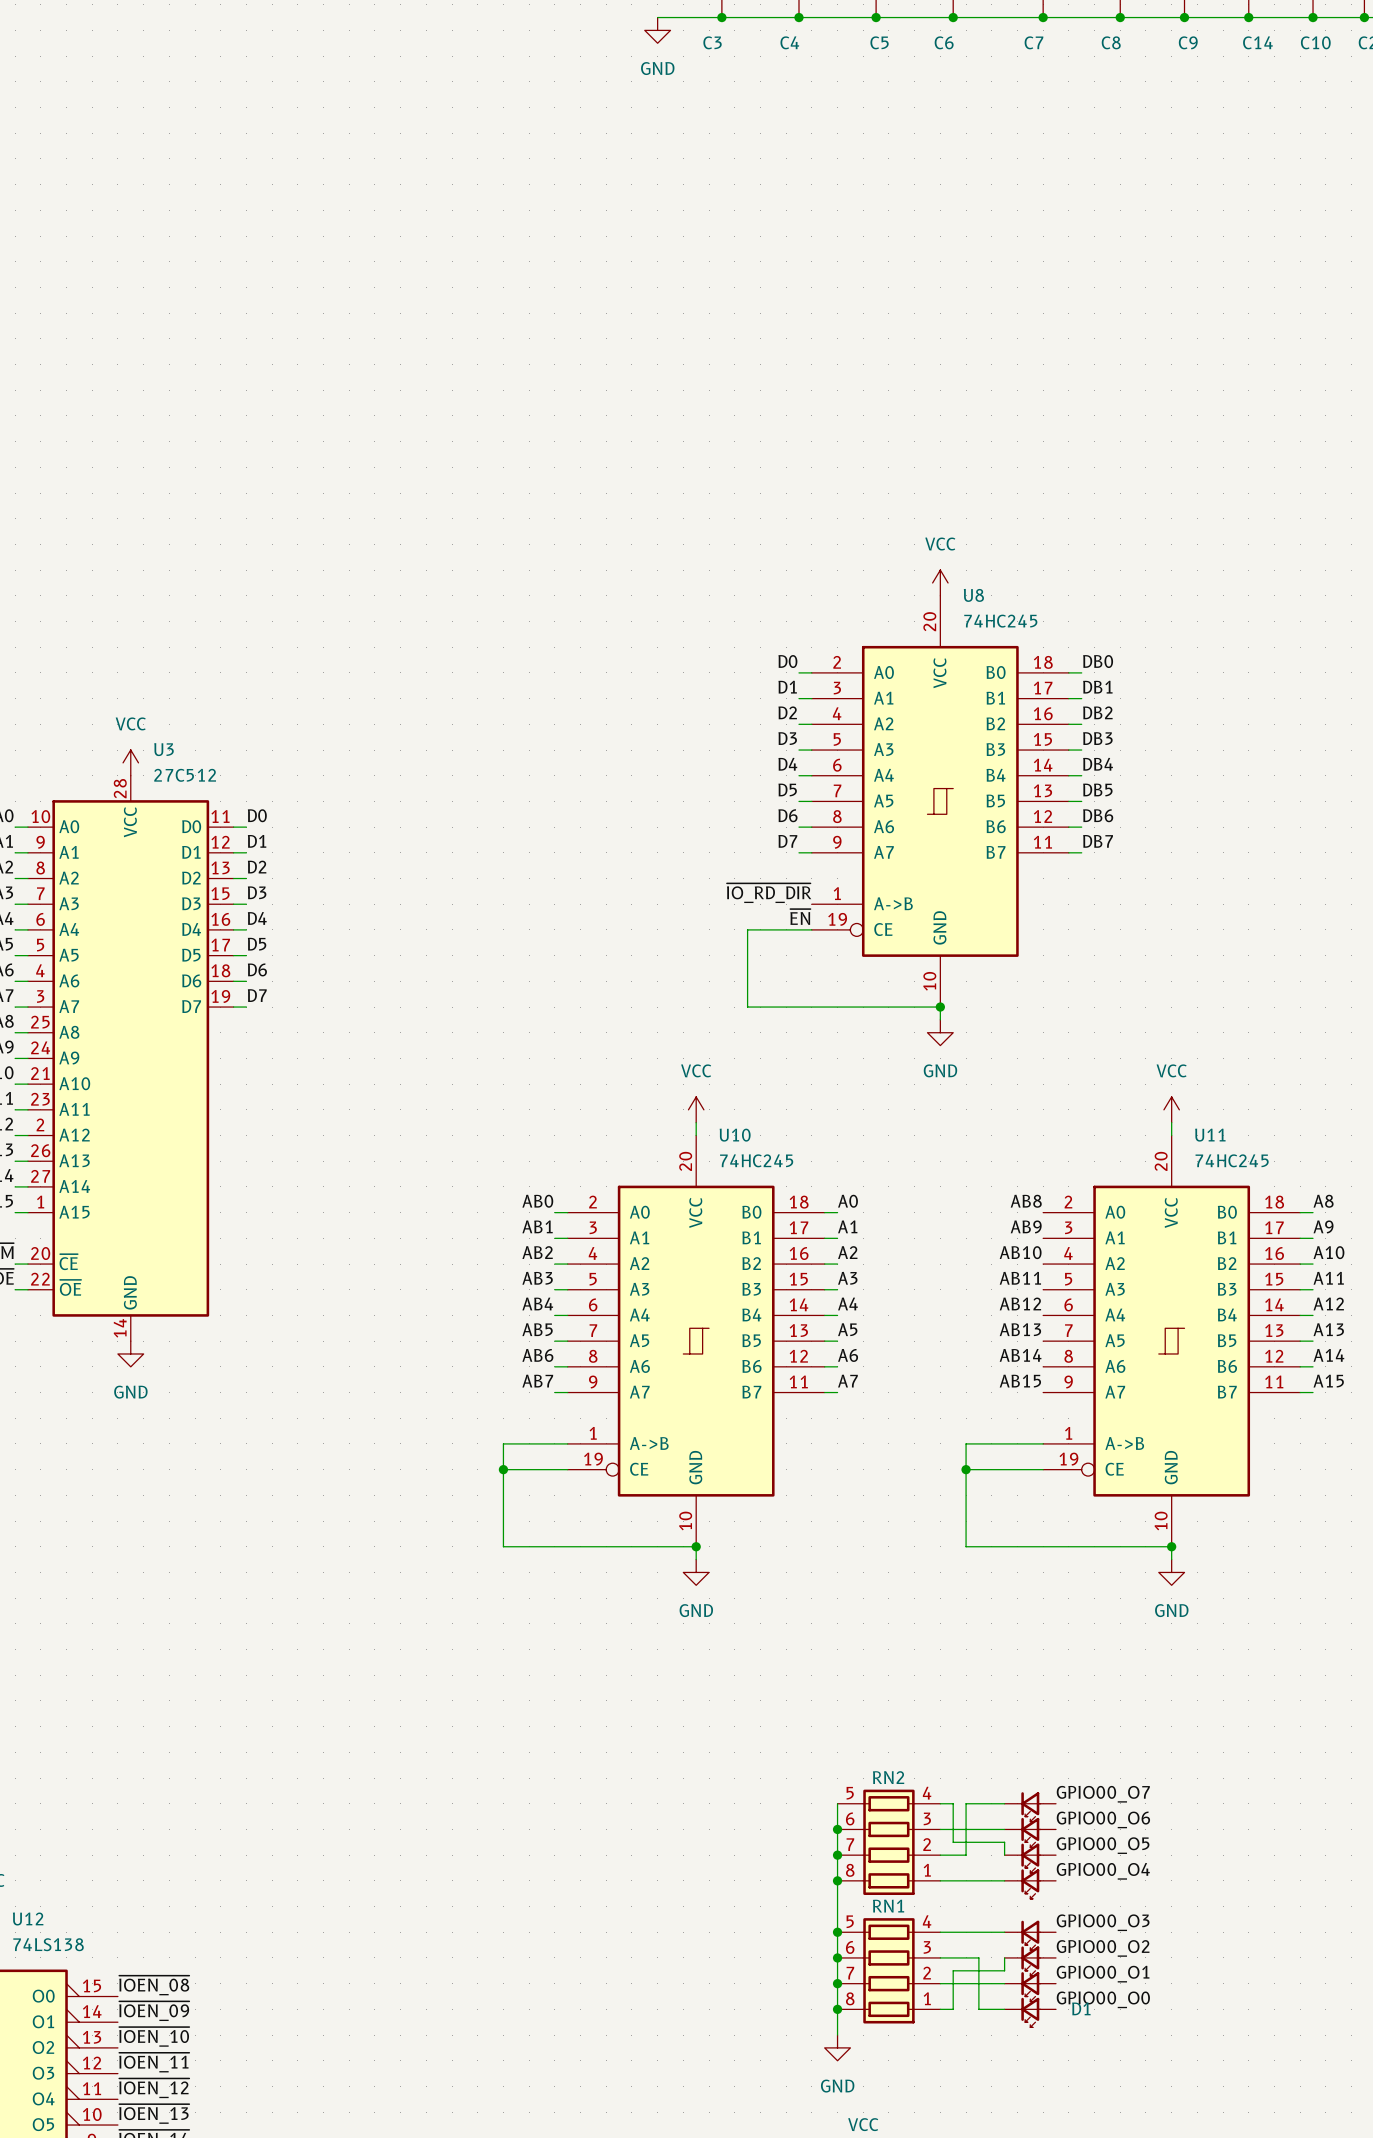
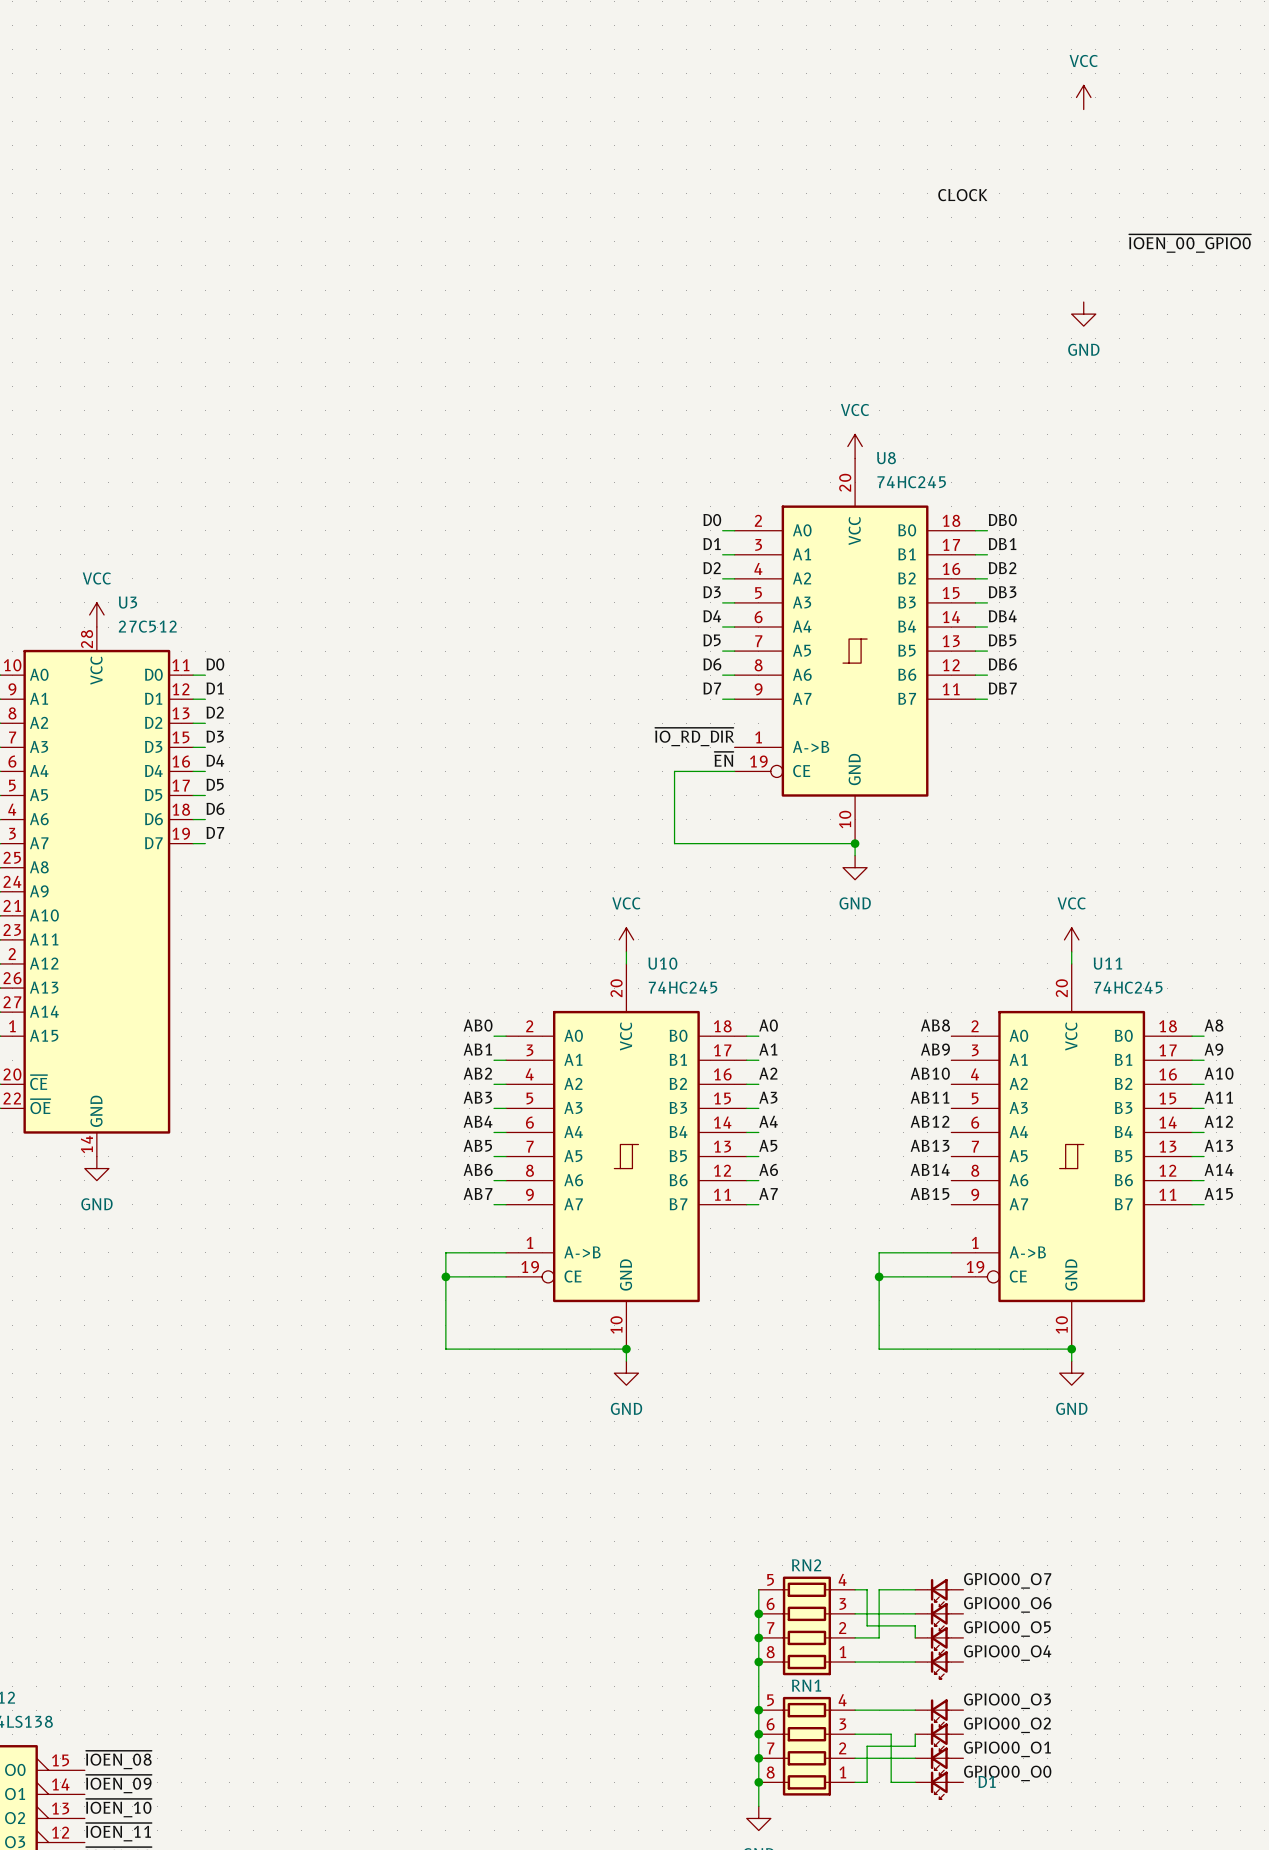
power symbol: none -> VCC (1083, 97)
label: none -> CLOCK (962, 195)
label: none -> ~{IOEN_00_GPIO0} (1190, 243)
power symbol: none -> GND (1083, 314)

